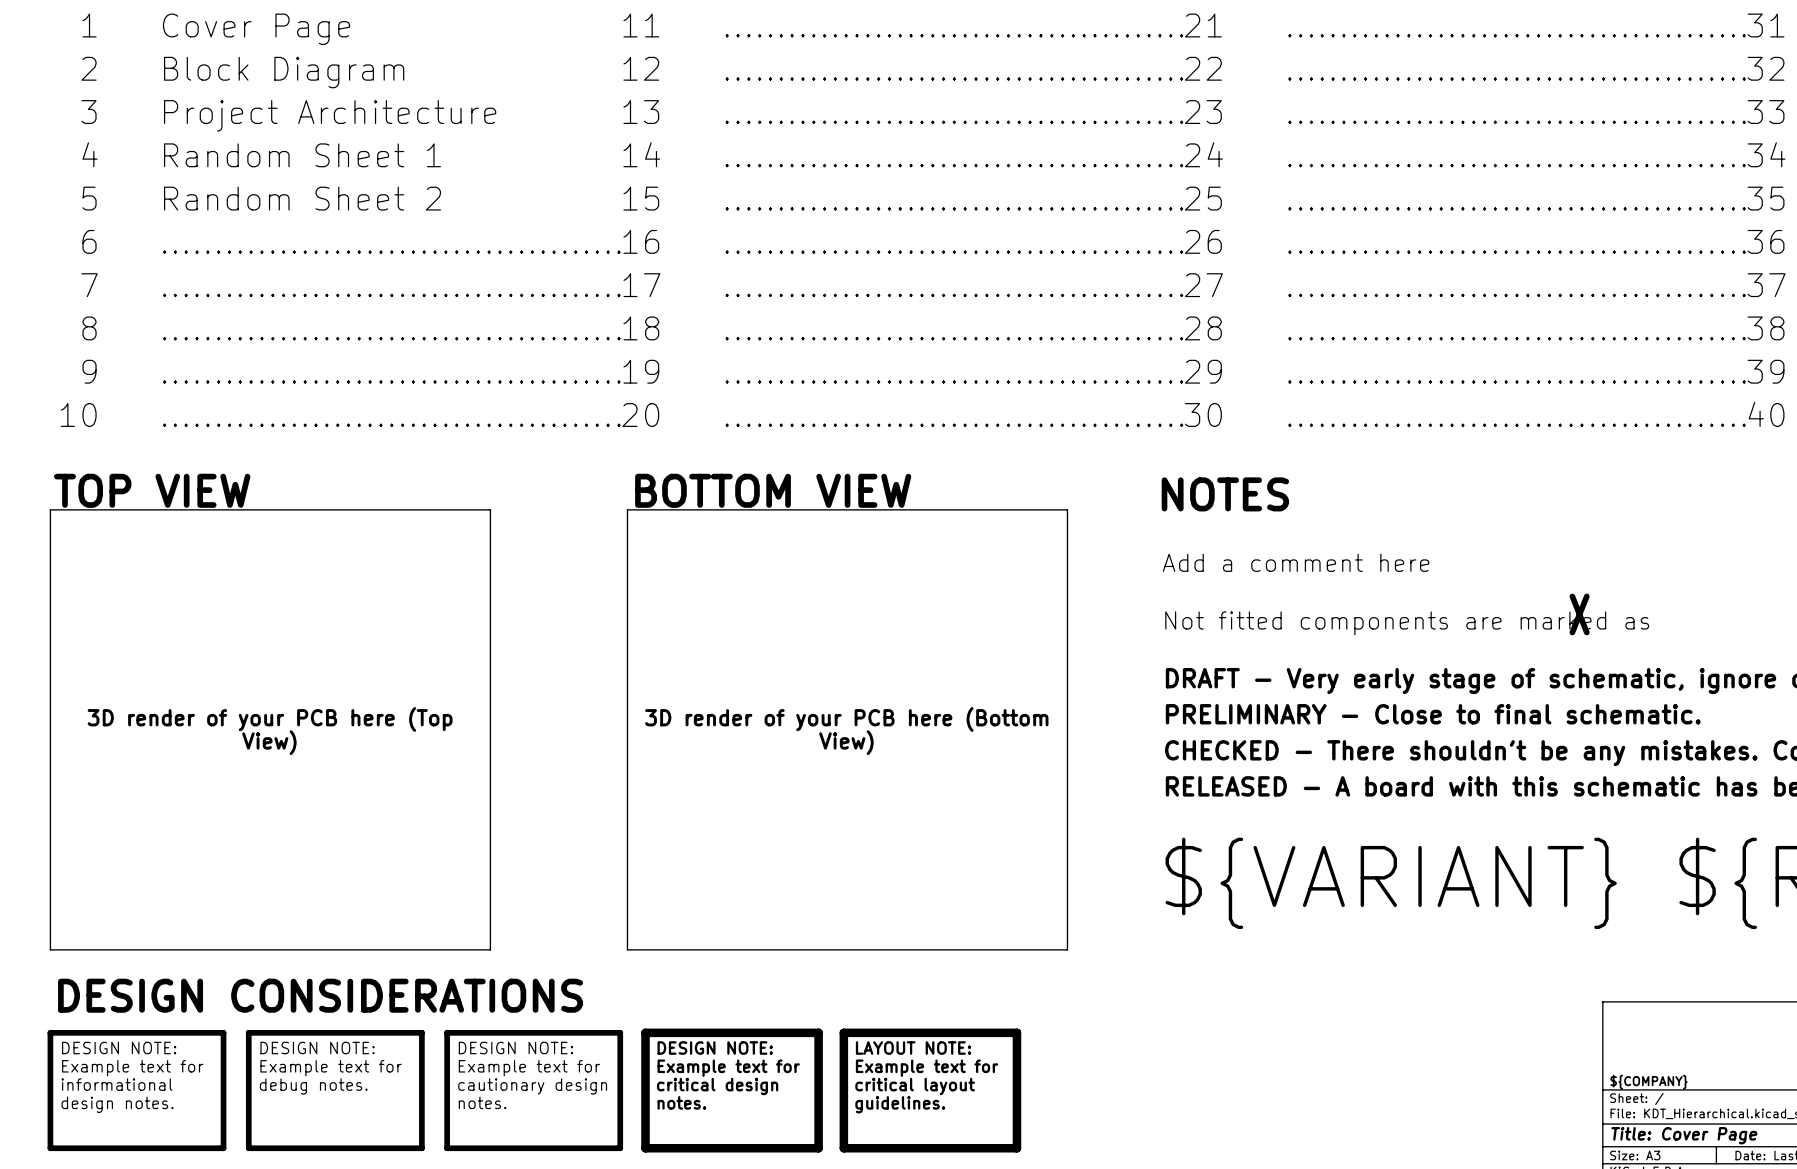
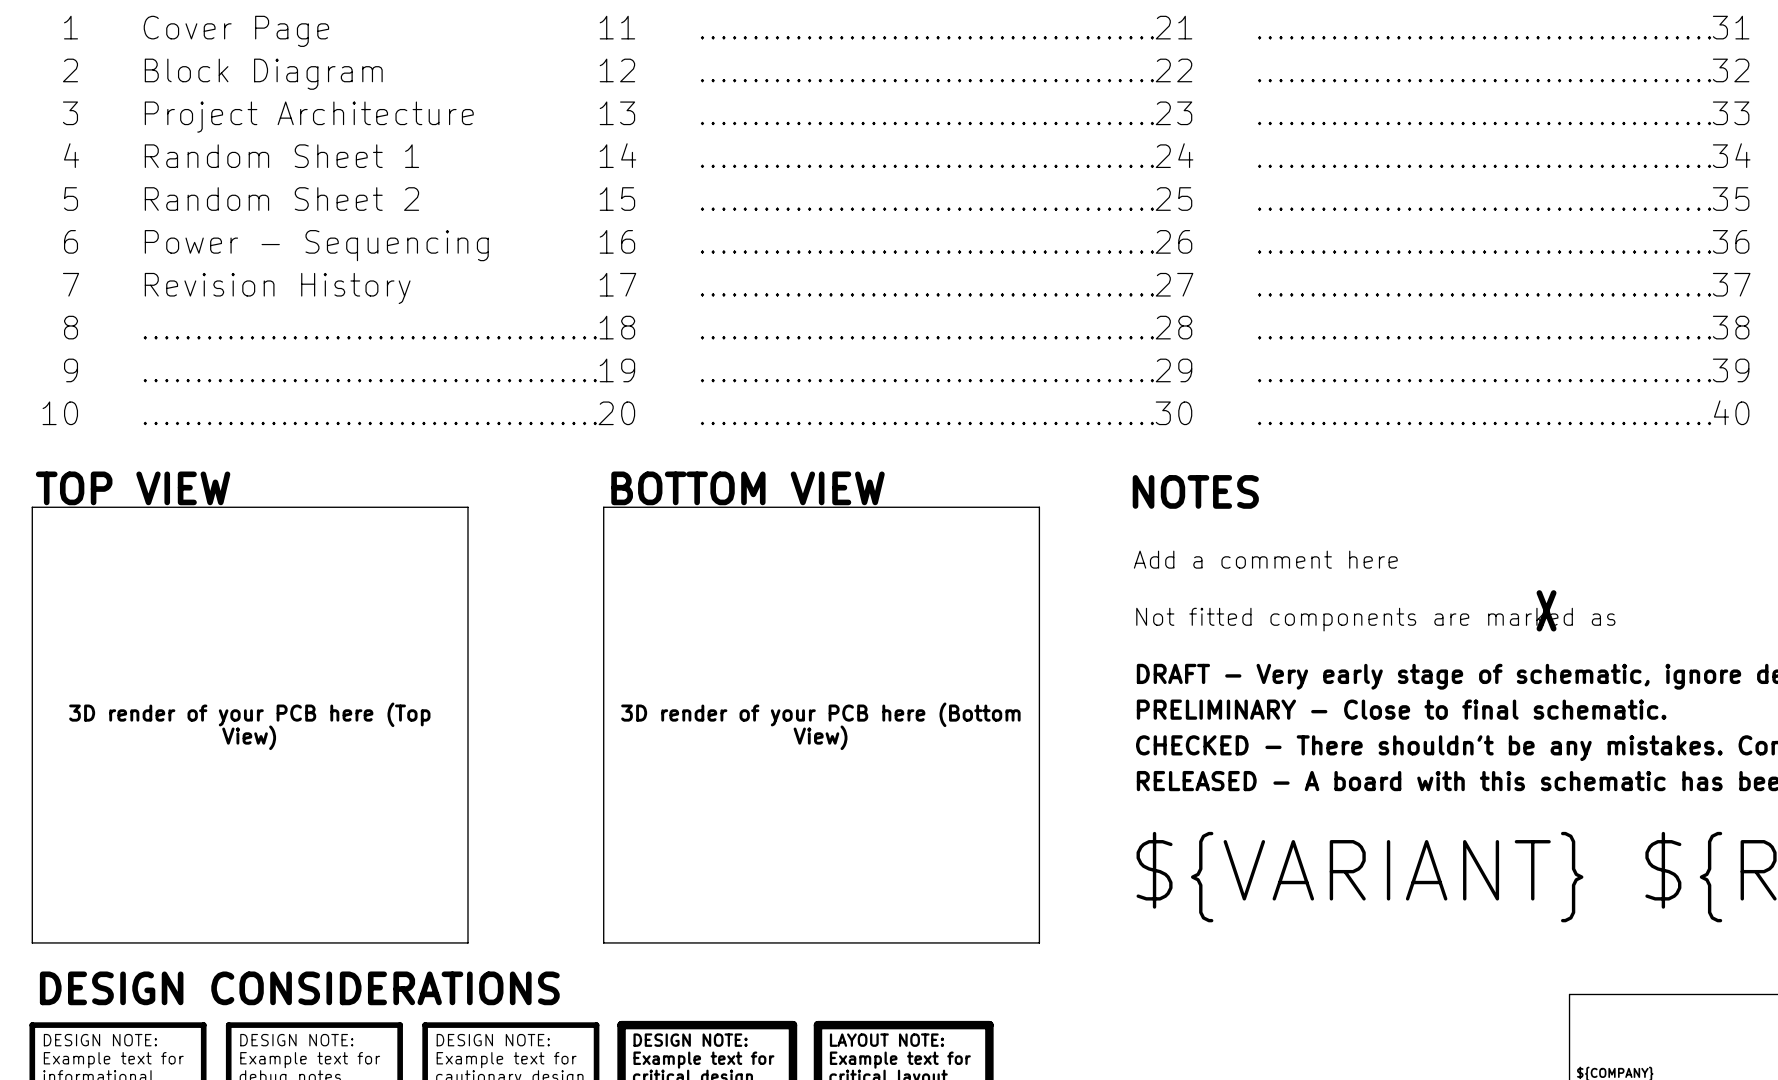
text: ........................................... (391, 252) -> Power - Sequencing (316, 245)
text: ........................................... (391, 295) -> Revision History (277, 288)

